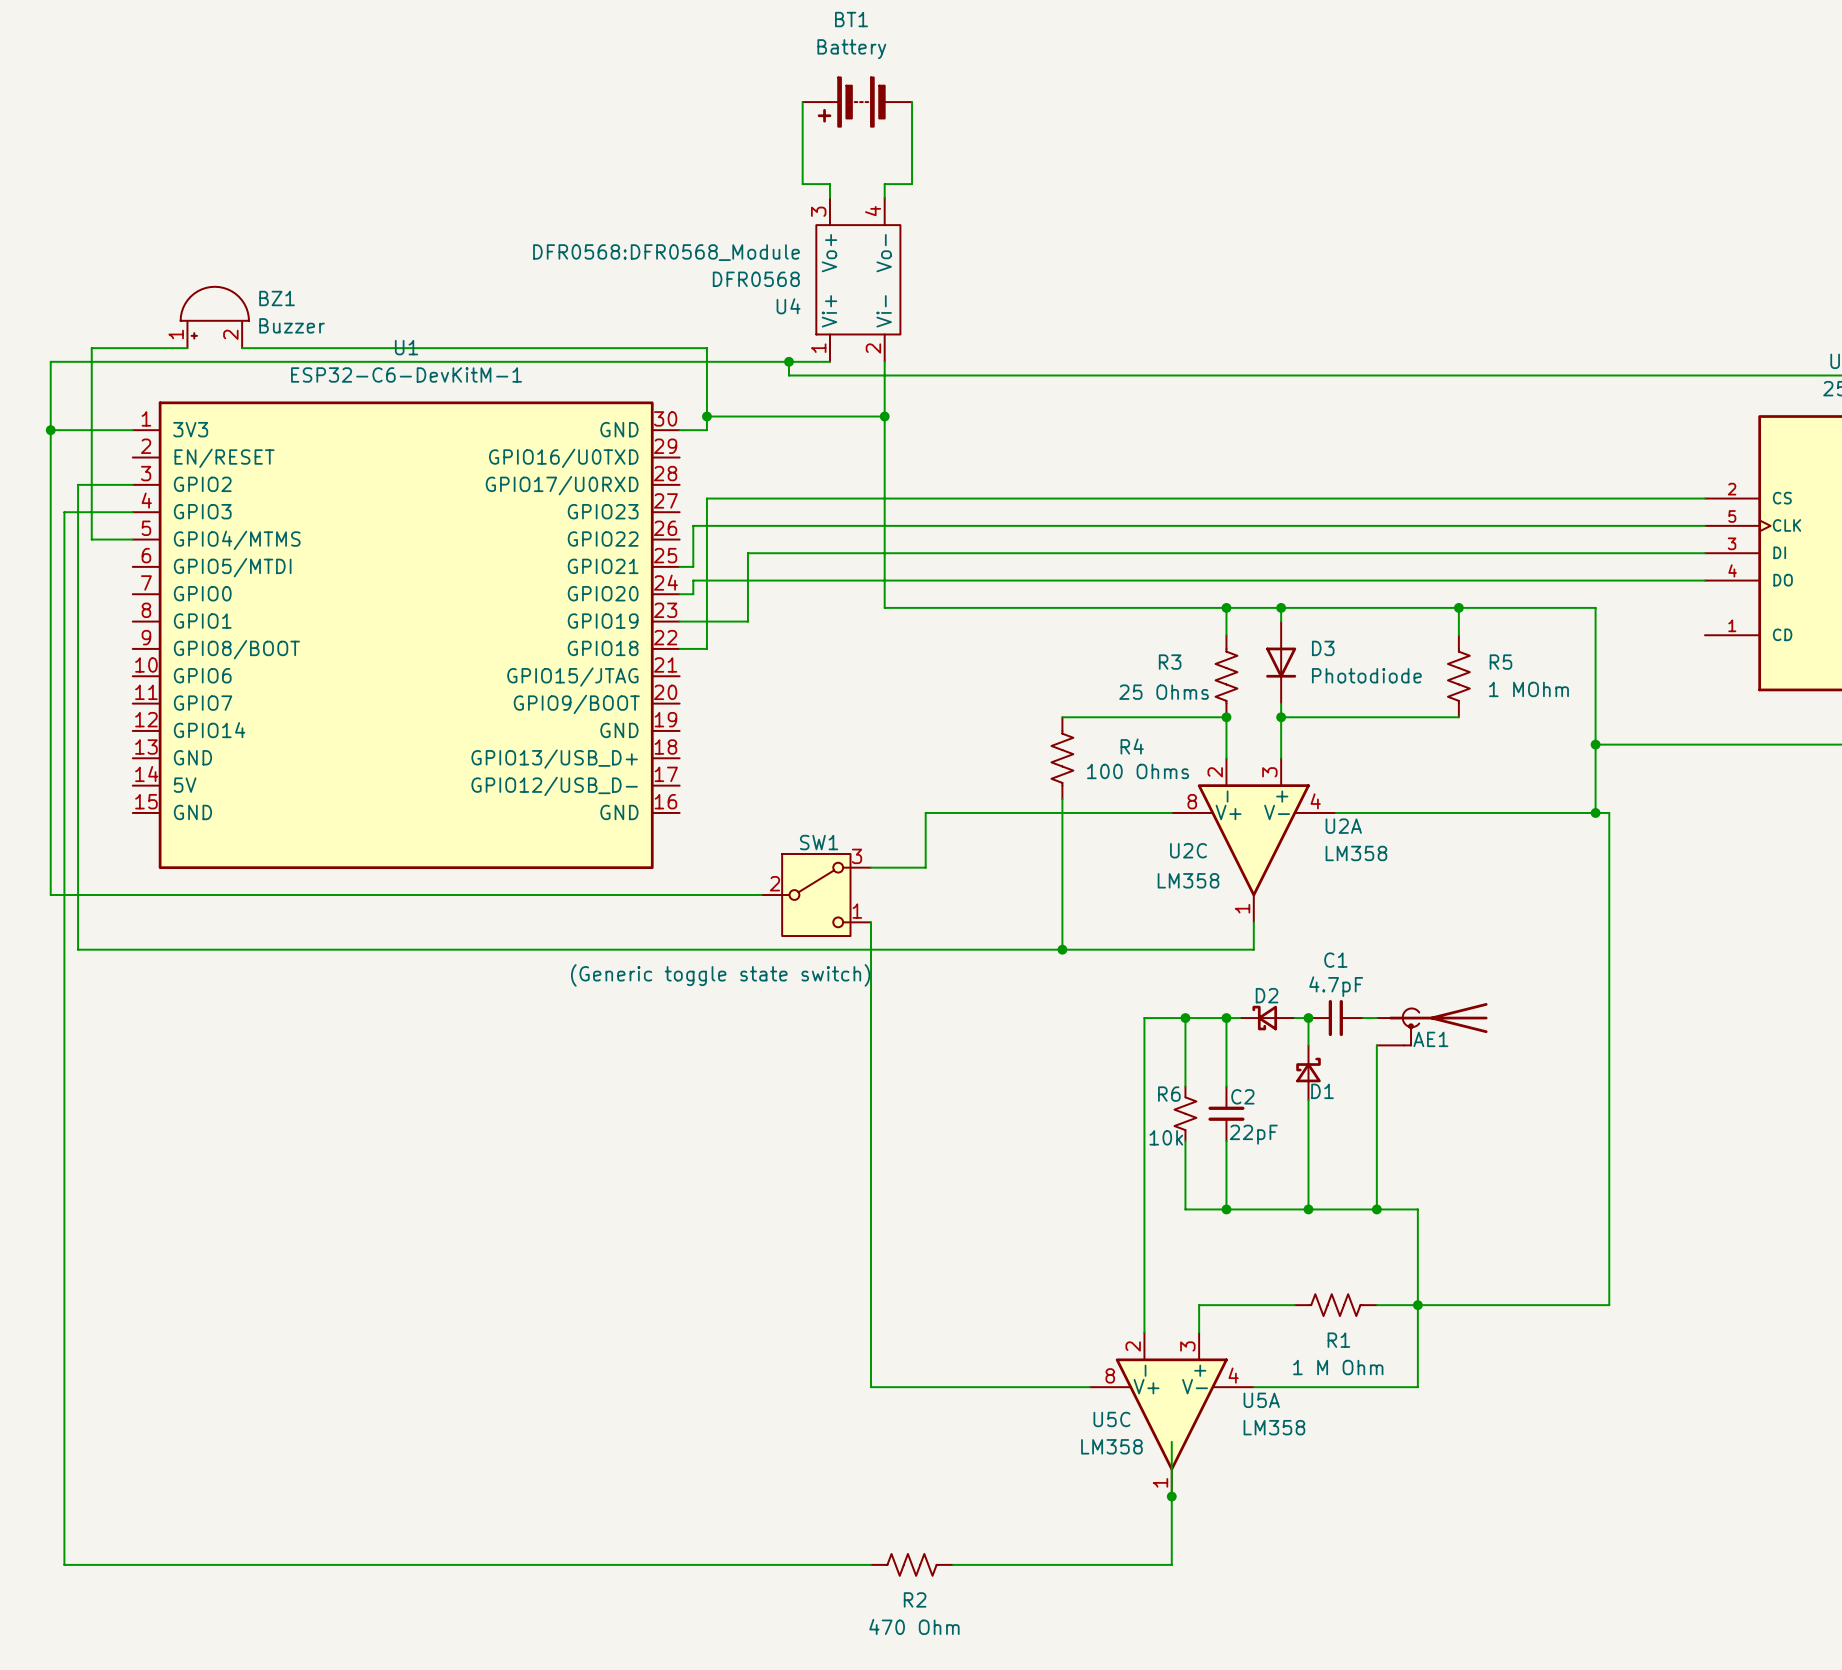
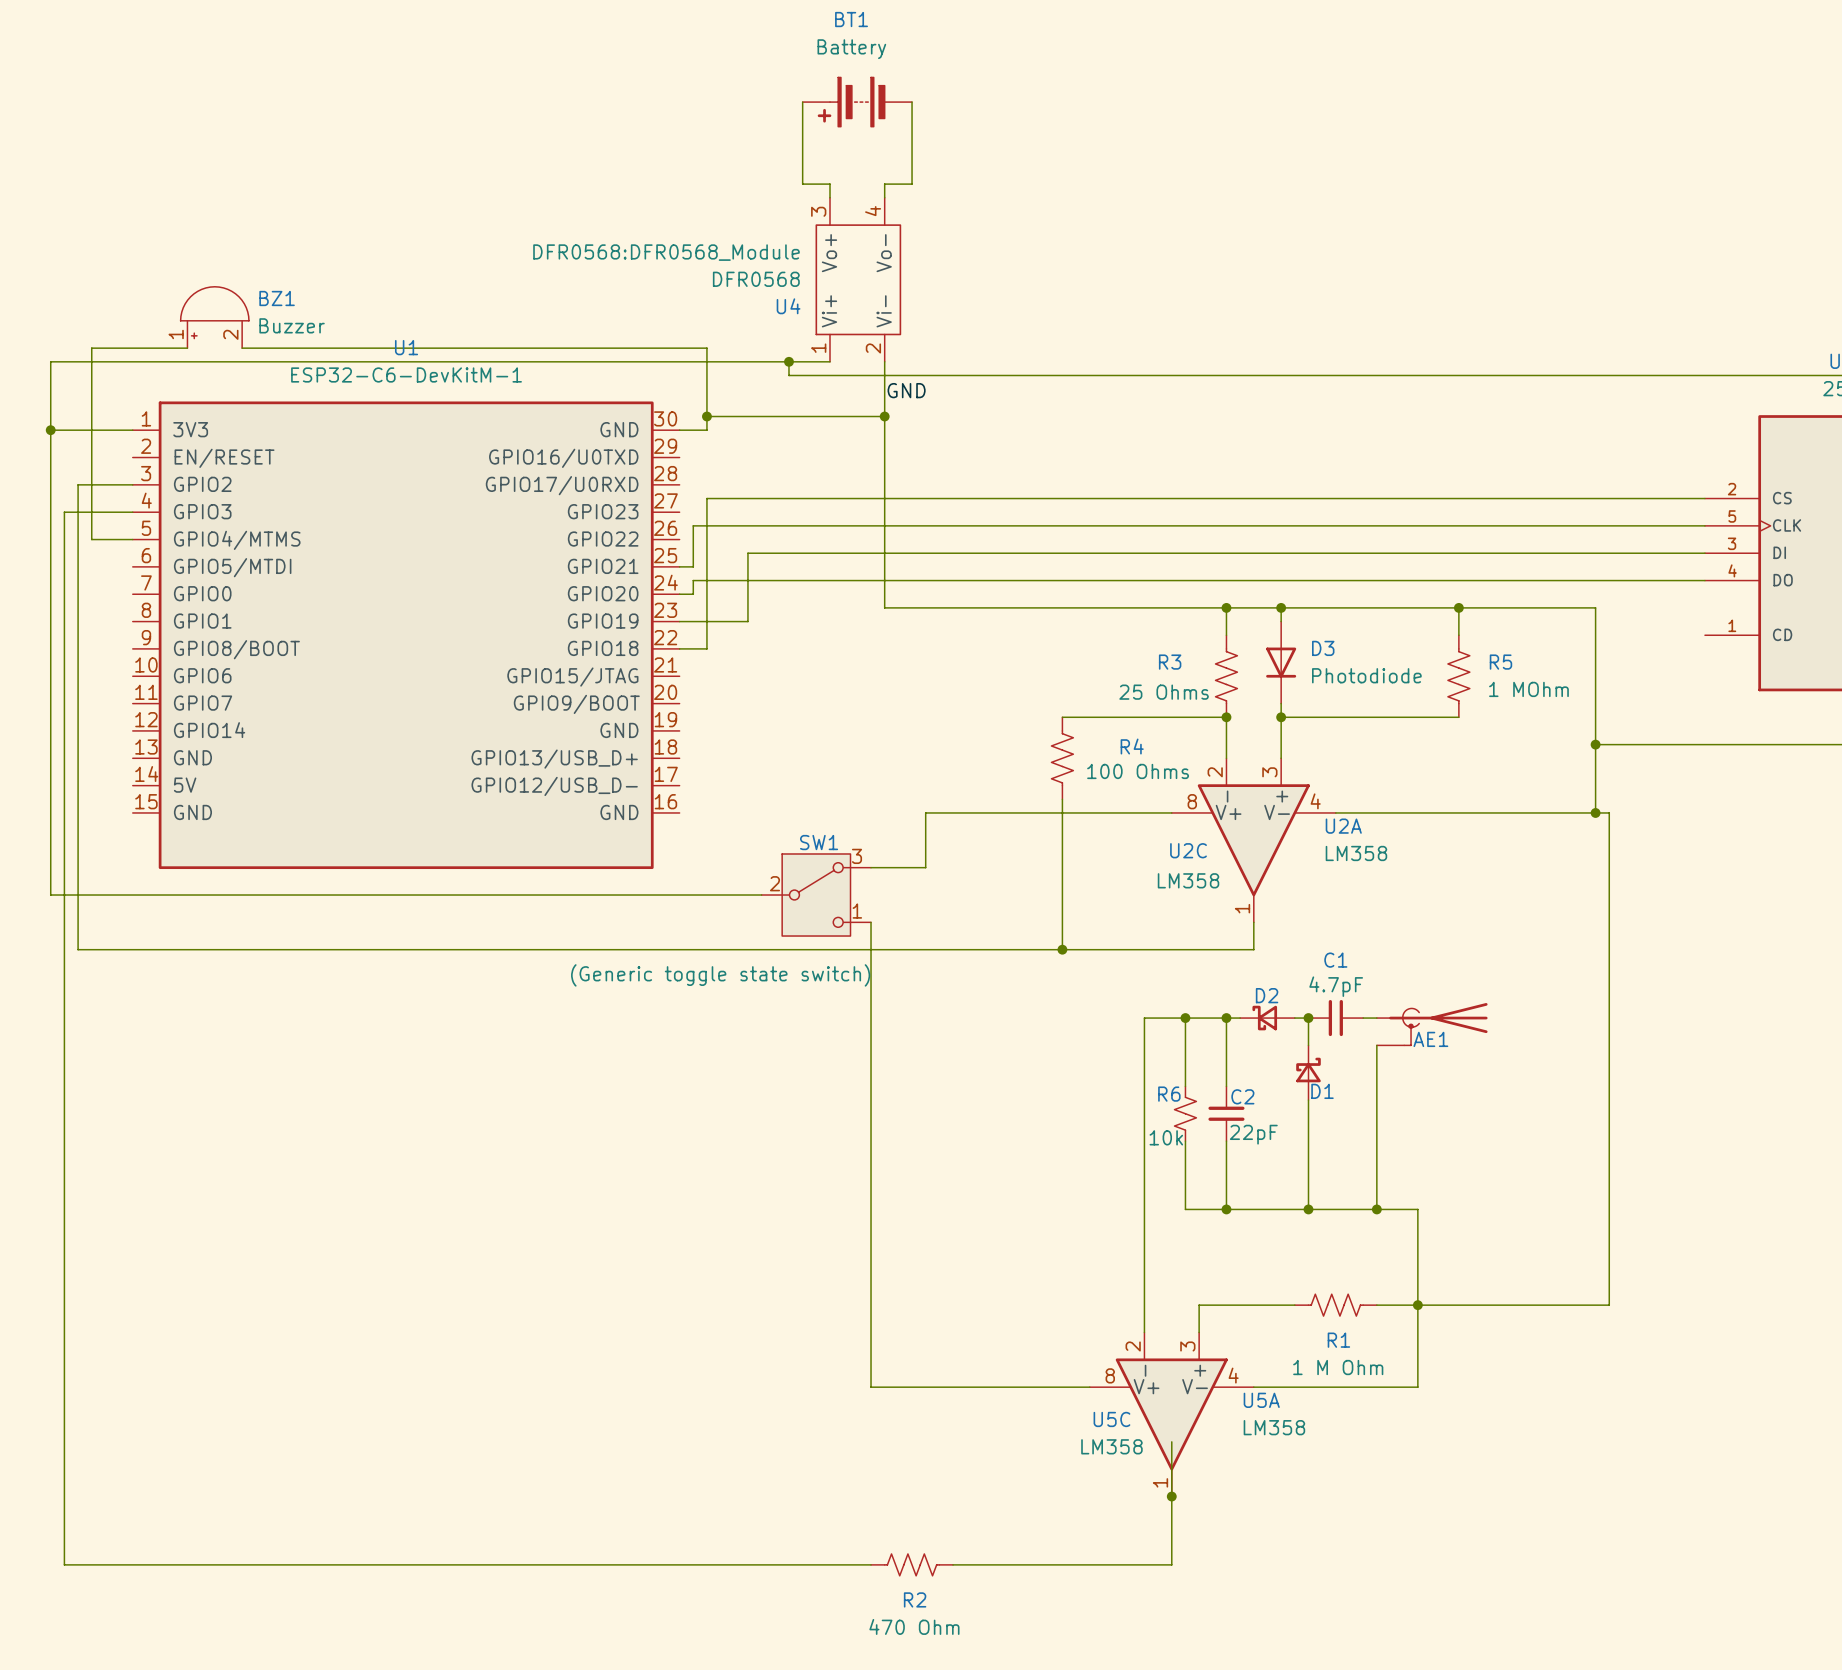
label: none -> GND (906, 390)

